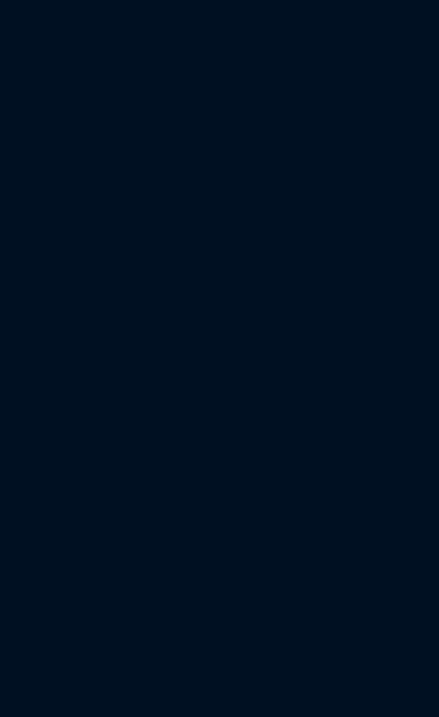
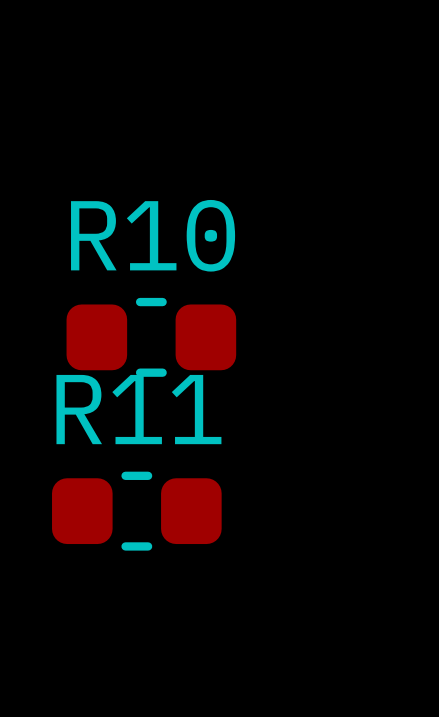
R10: none -> (151, 337)
R11: none -> (136, 511)

